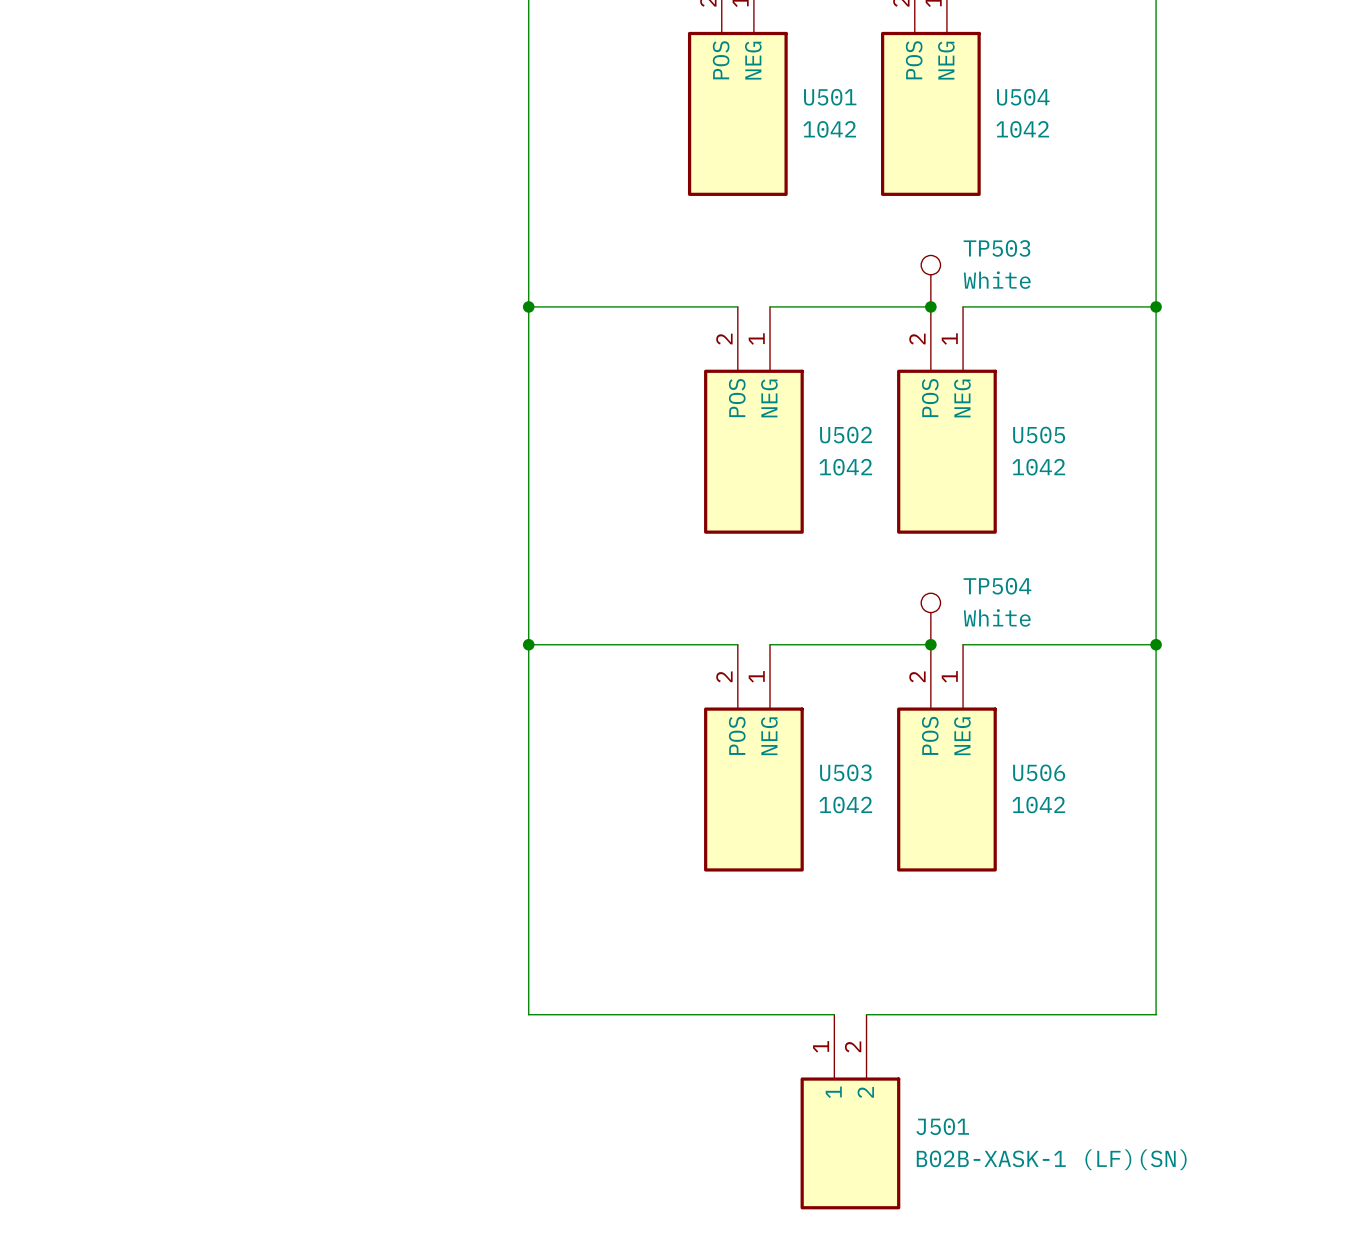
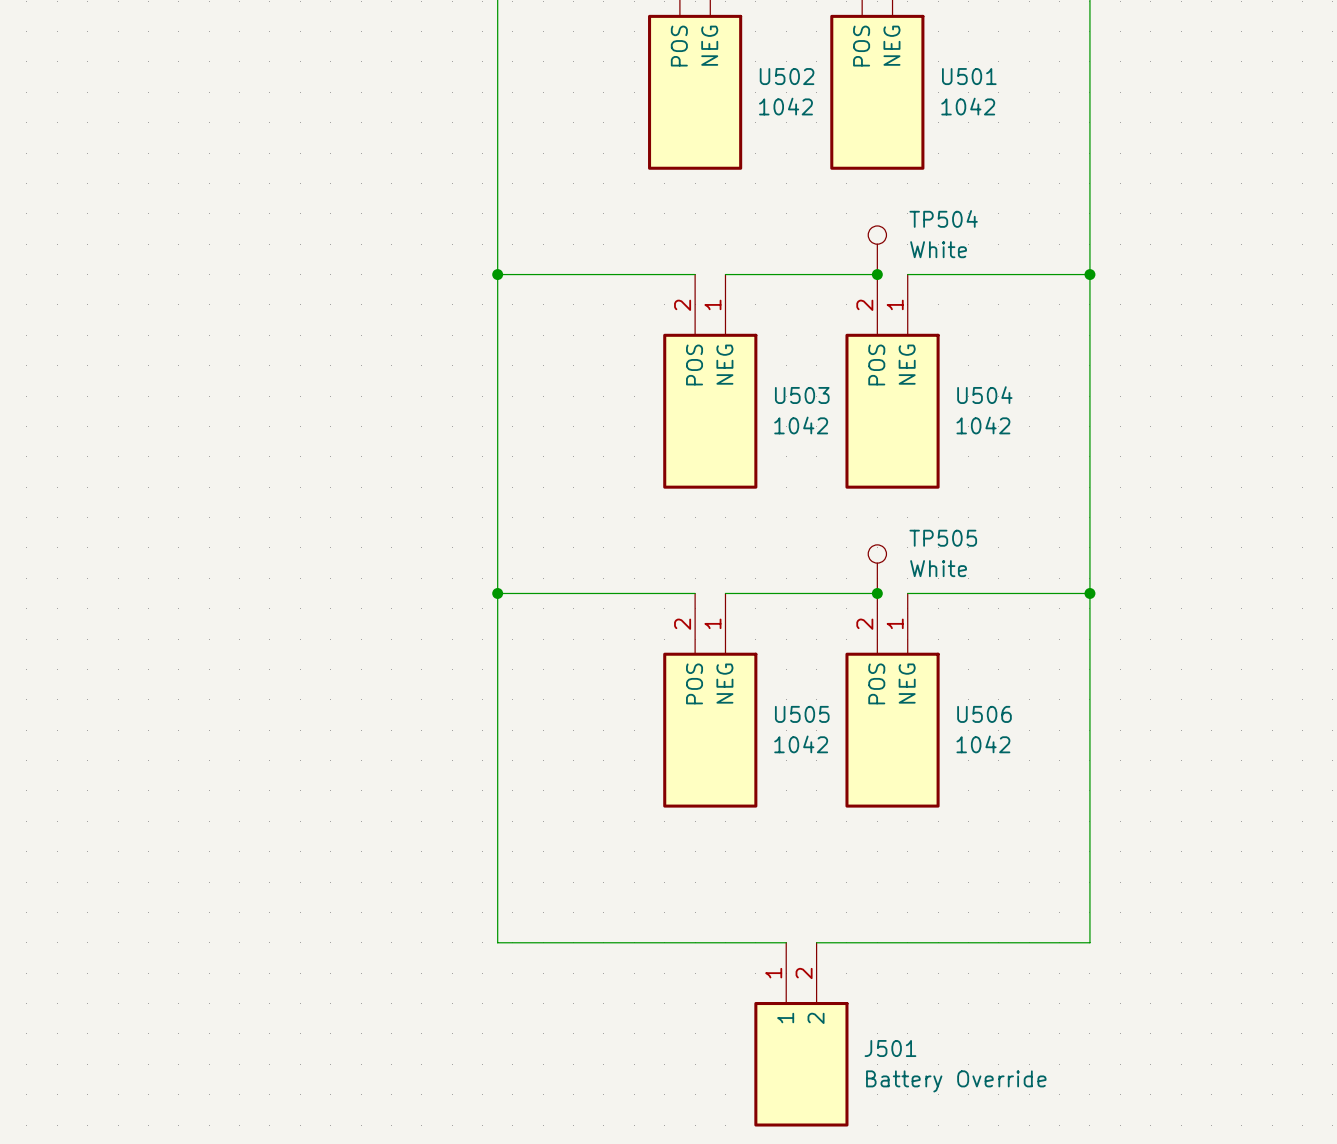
U501 name: U501 (830, 97) -> U502 (787, 76)
U504 name: U504 (1023, 97) -> U501 (969, 76)
TP503 name: TP503 (996, 248) -> TP504 (943, 218)
U502 name: U502 (846, 435) -> U503 (802, 395)
U505 name: U505 (1039, 435) -> U504 (984, 395)
TP504 name: TP504 (997, 586) -> TP505 (943, 538)
U503 name: U503 (845, 772) -> U505 (802, 714)
J501 value: B02B-XASK-1 (LF)(SN) (1051, 1159) -> Battery Override (956, 1081)

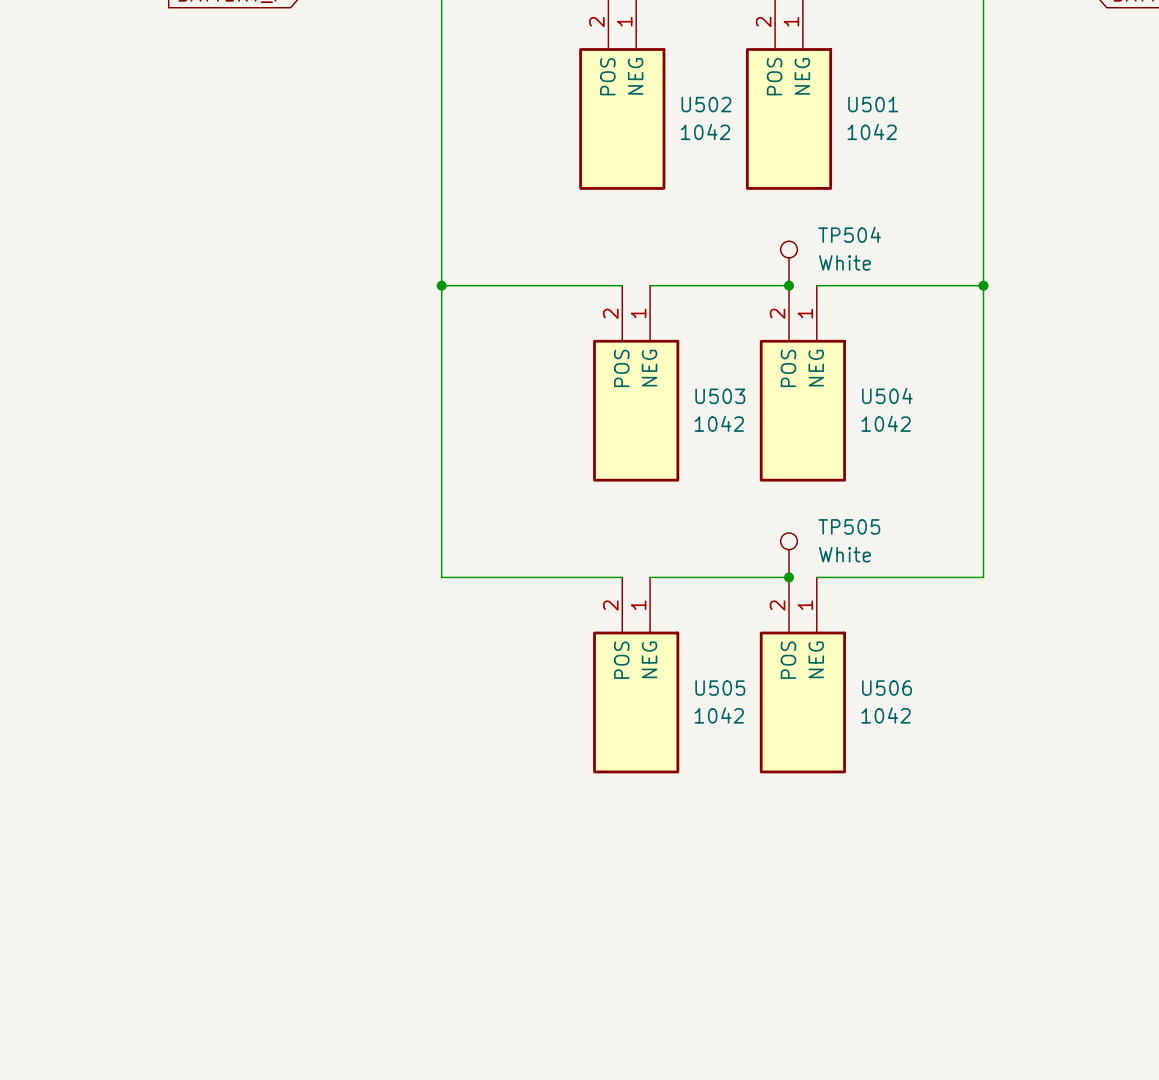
wire: (497, 593) (497, 942) (786, 942) -> none
junction: (497, 593) -> none
wire: (1089, 593) (1089, 942) (816, 942) -> none
junction: (1089, 593) -> none
J501: Battery Override (801, 1034) -> none

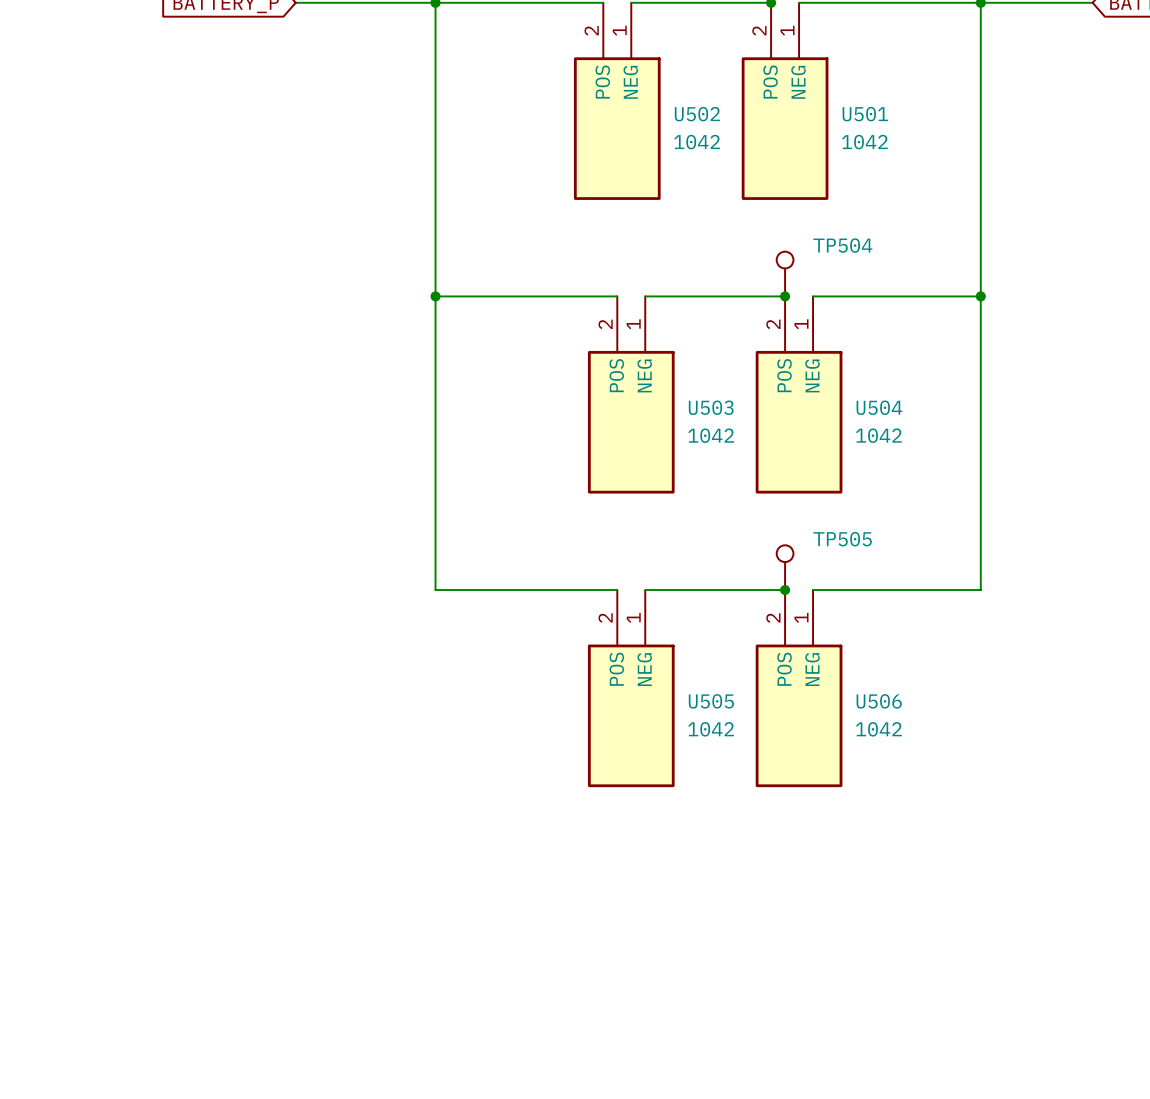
TP504 value: White (845, 262) -> none
TP505 value: White (845, 554) -> none

